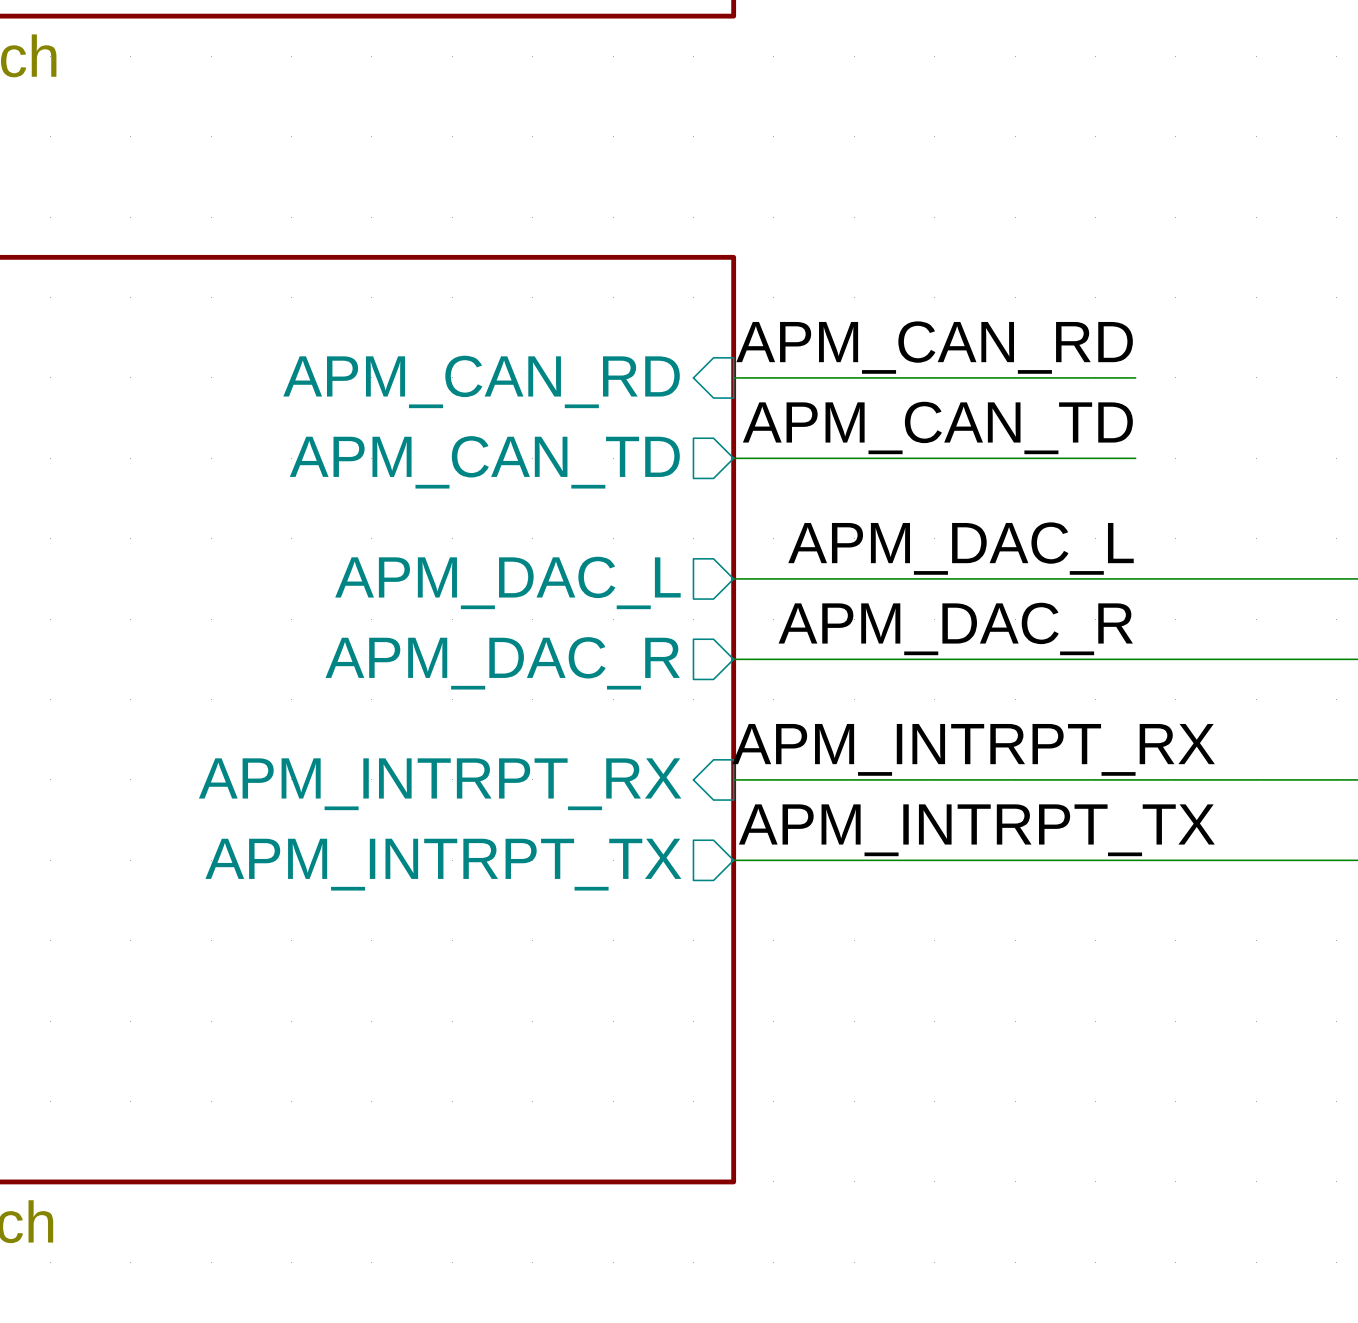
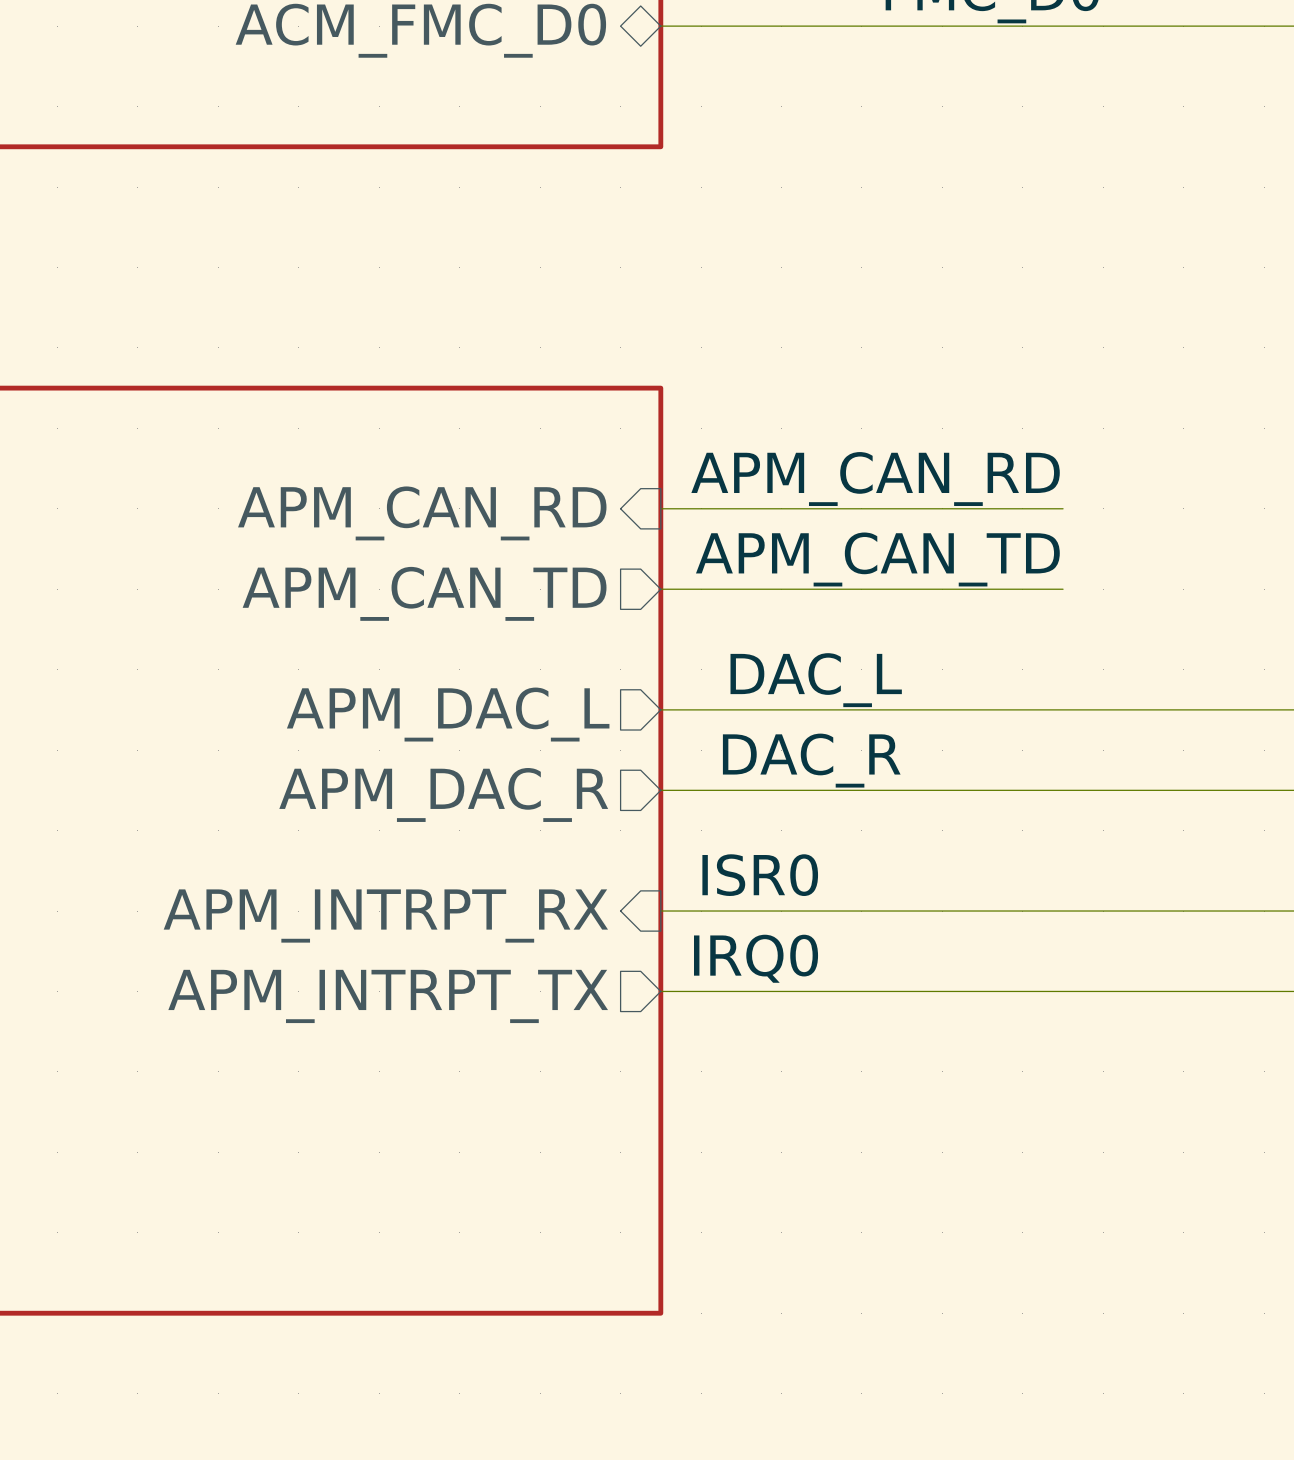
label: APM_DAC_L (961, 548) -> DAC_L (816, 680)
label: APM_DAC_R (955, 628) -> DAC_R (811, 760)
label: none -> ISR0 (760, 875)
label: APM_INTRPT_RX (973, 749) -> none
label: none -> IRQ0 (756, 958)
label: APM_INTRPT_TX (976, 830) -> none

